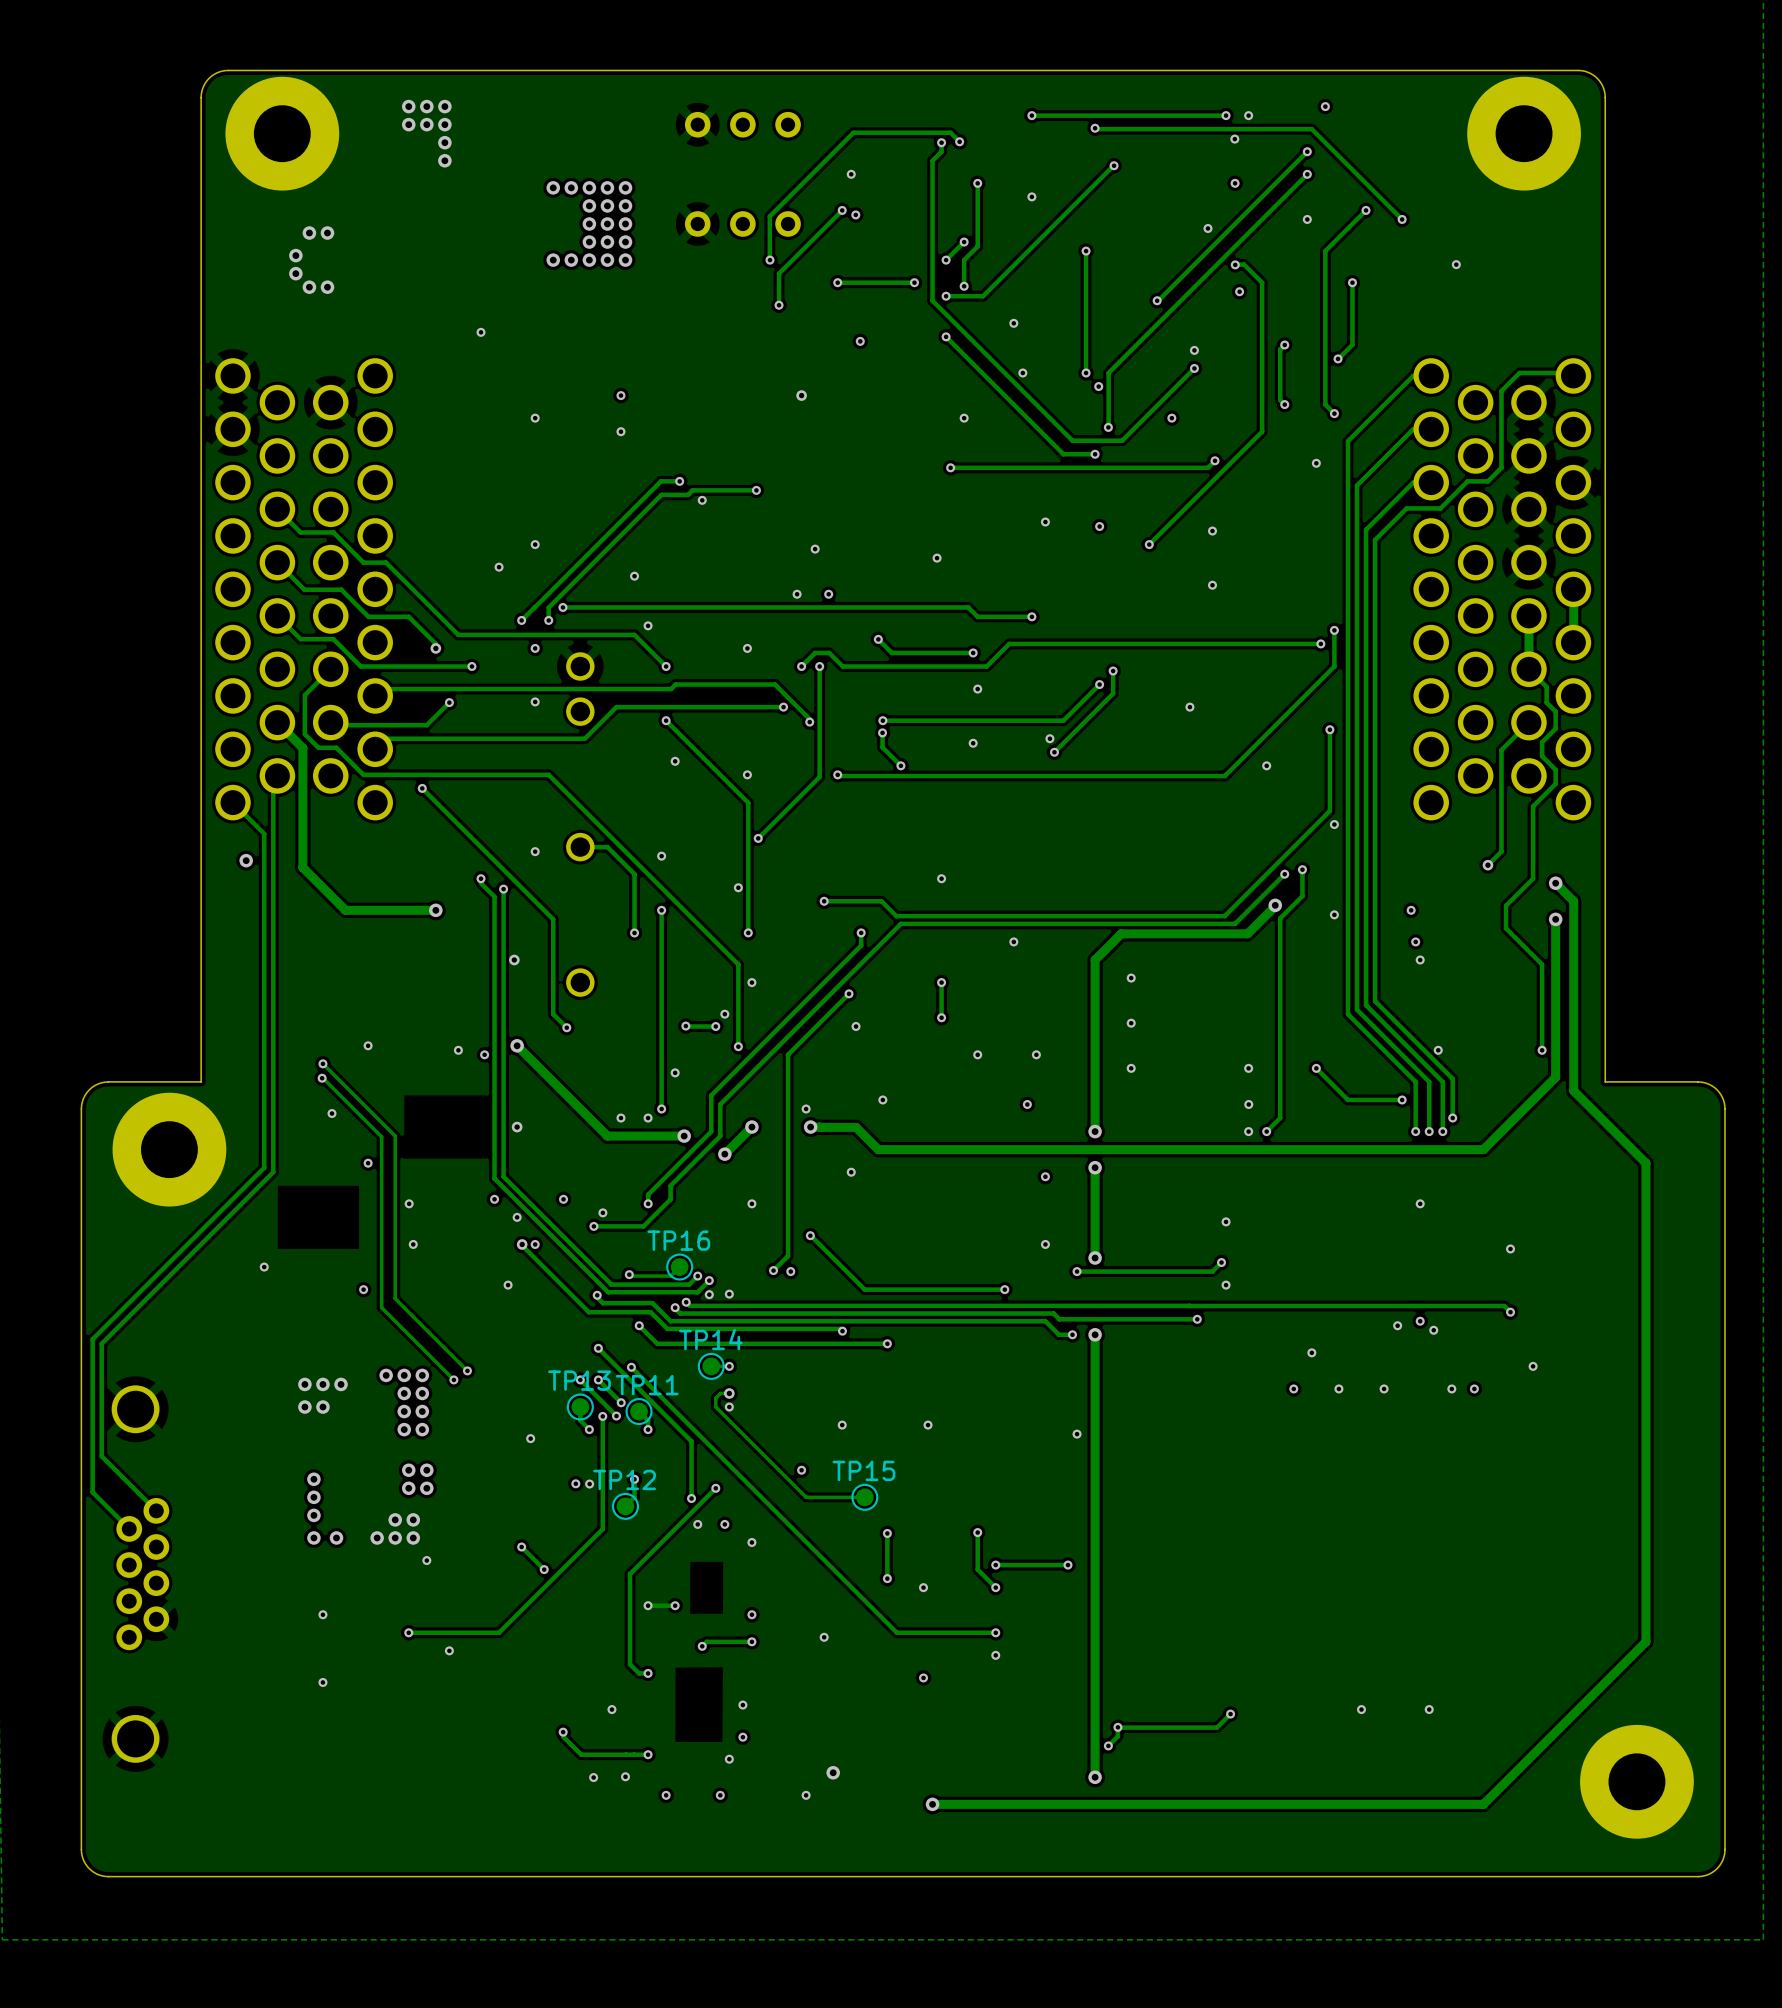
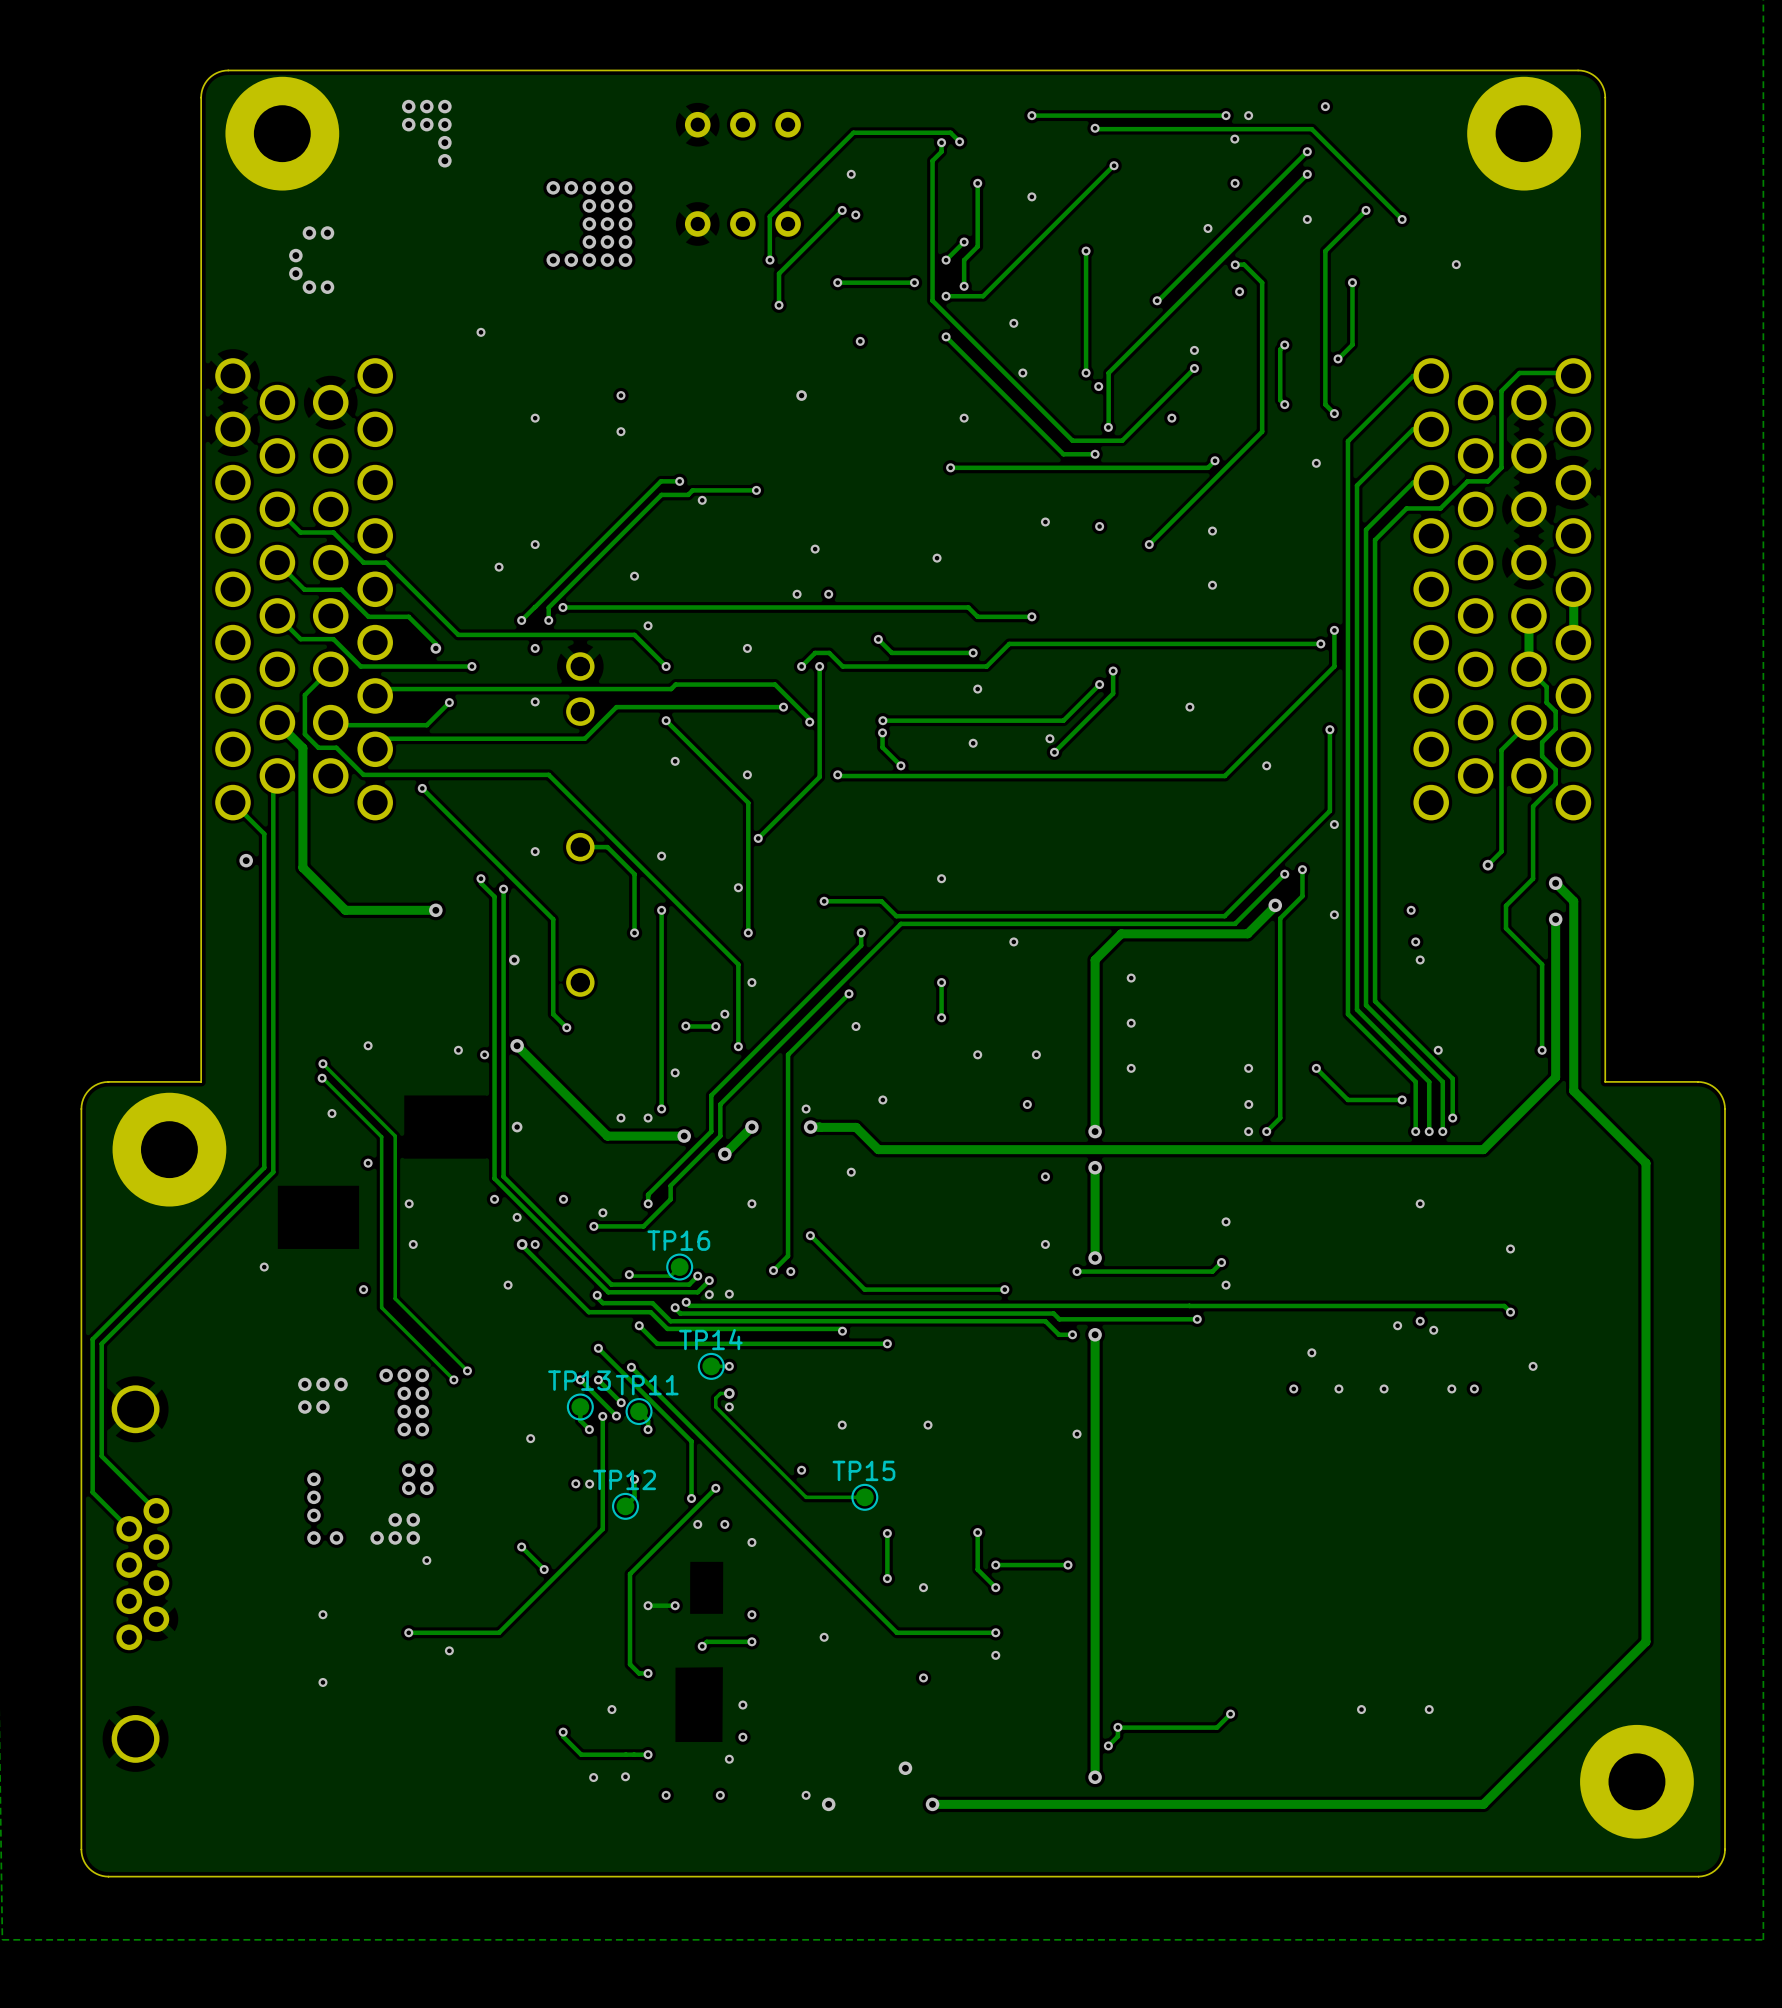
via: none -> (905, 1768)
via position: (833, 1772) -> (828, 1804)

